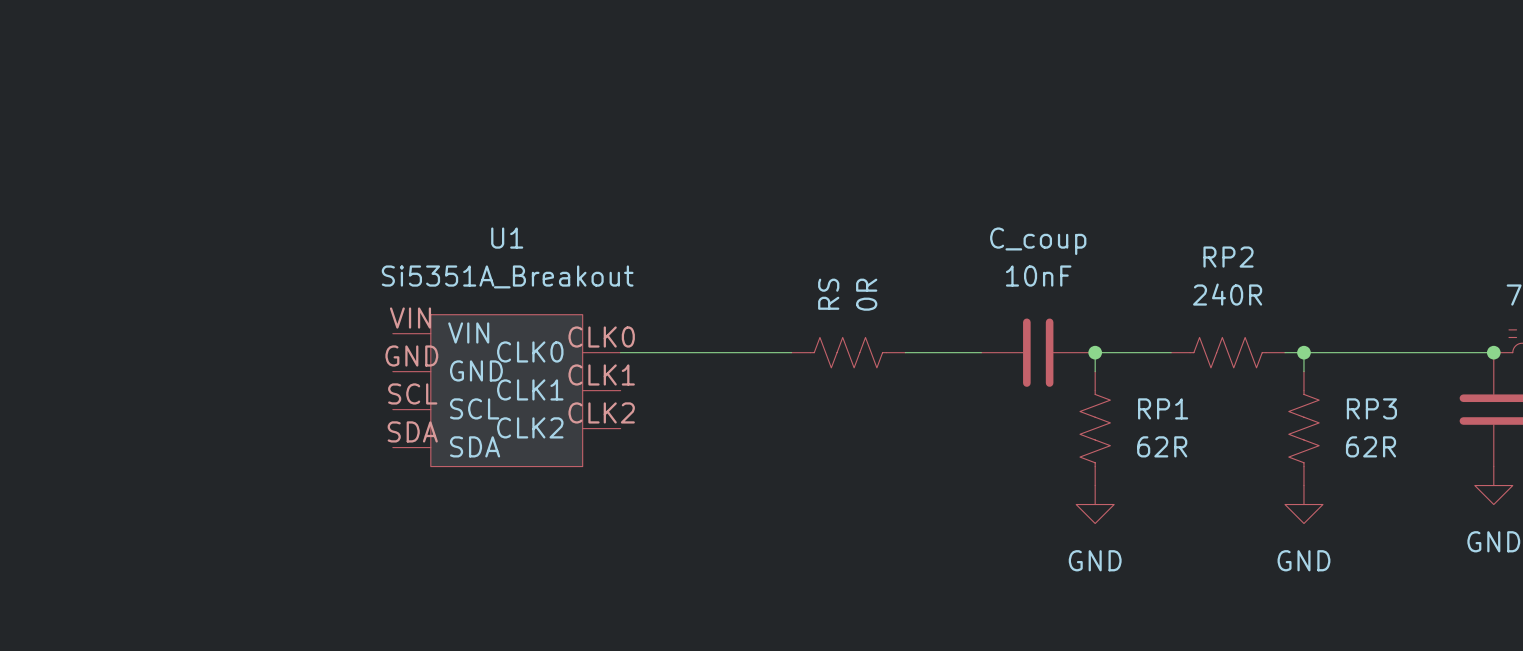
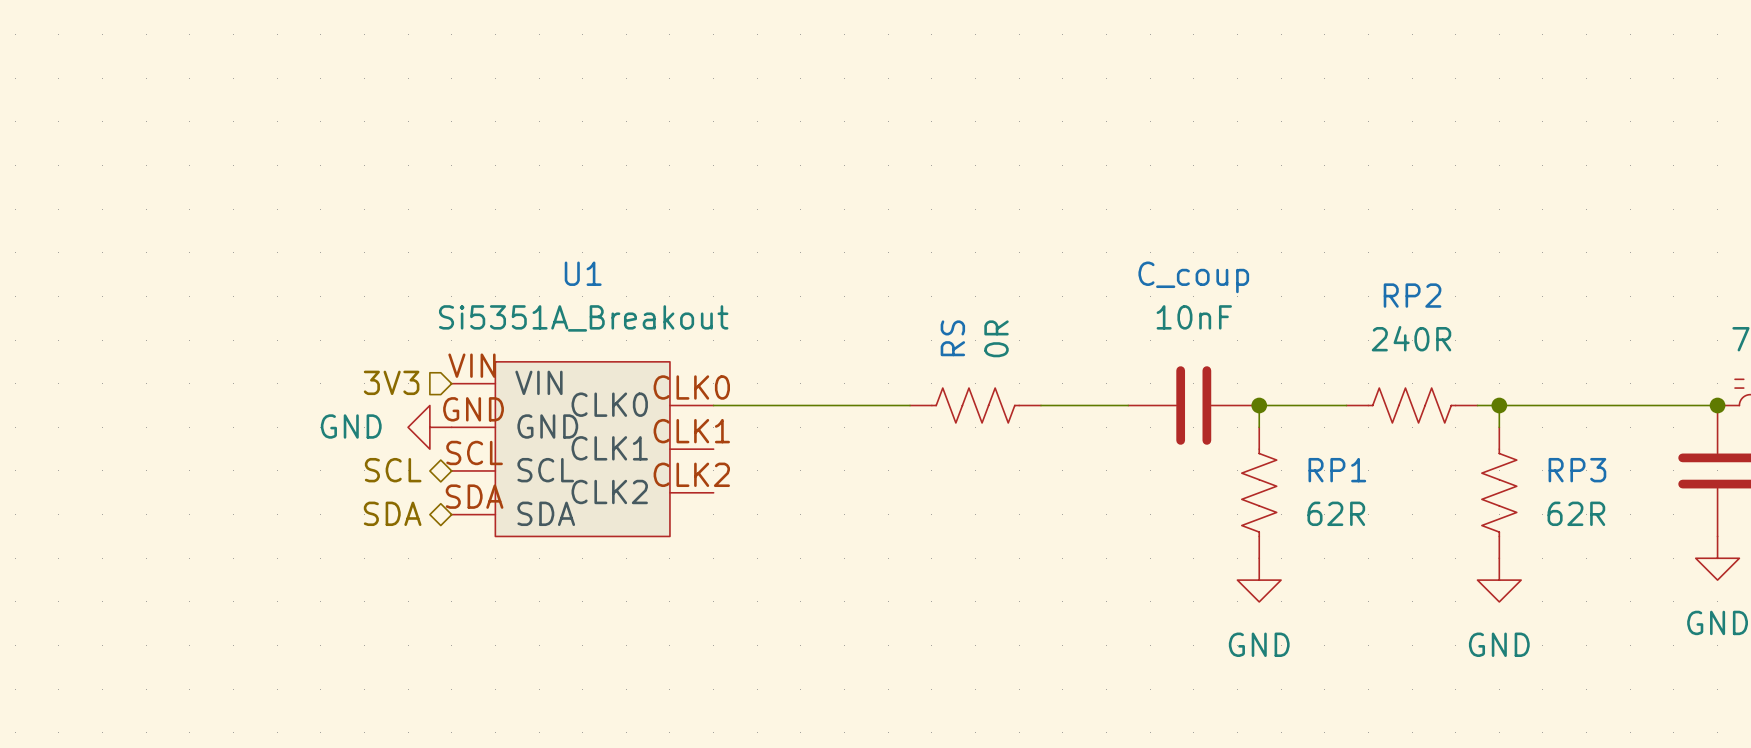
hierarchical label: none -> 3V3 (391, 382)
power symbol: none -> GND (429, 427)
hierarchical label: none -> SCL (393, 470)
hierarchical label: none -> SDA (392, 513)

